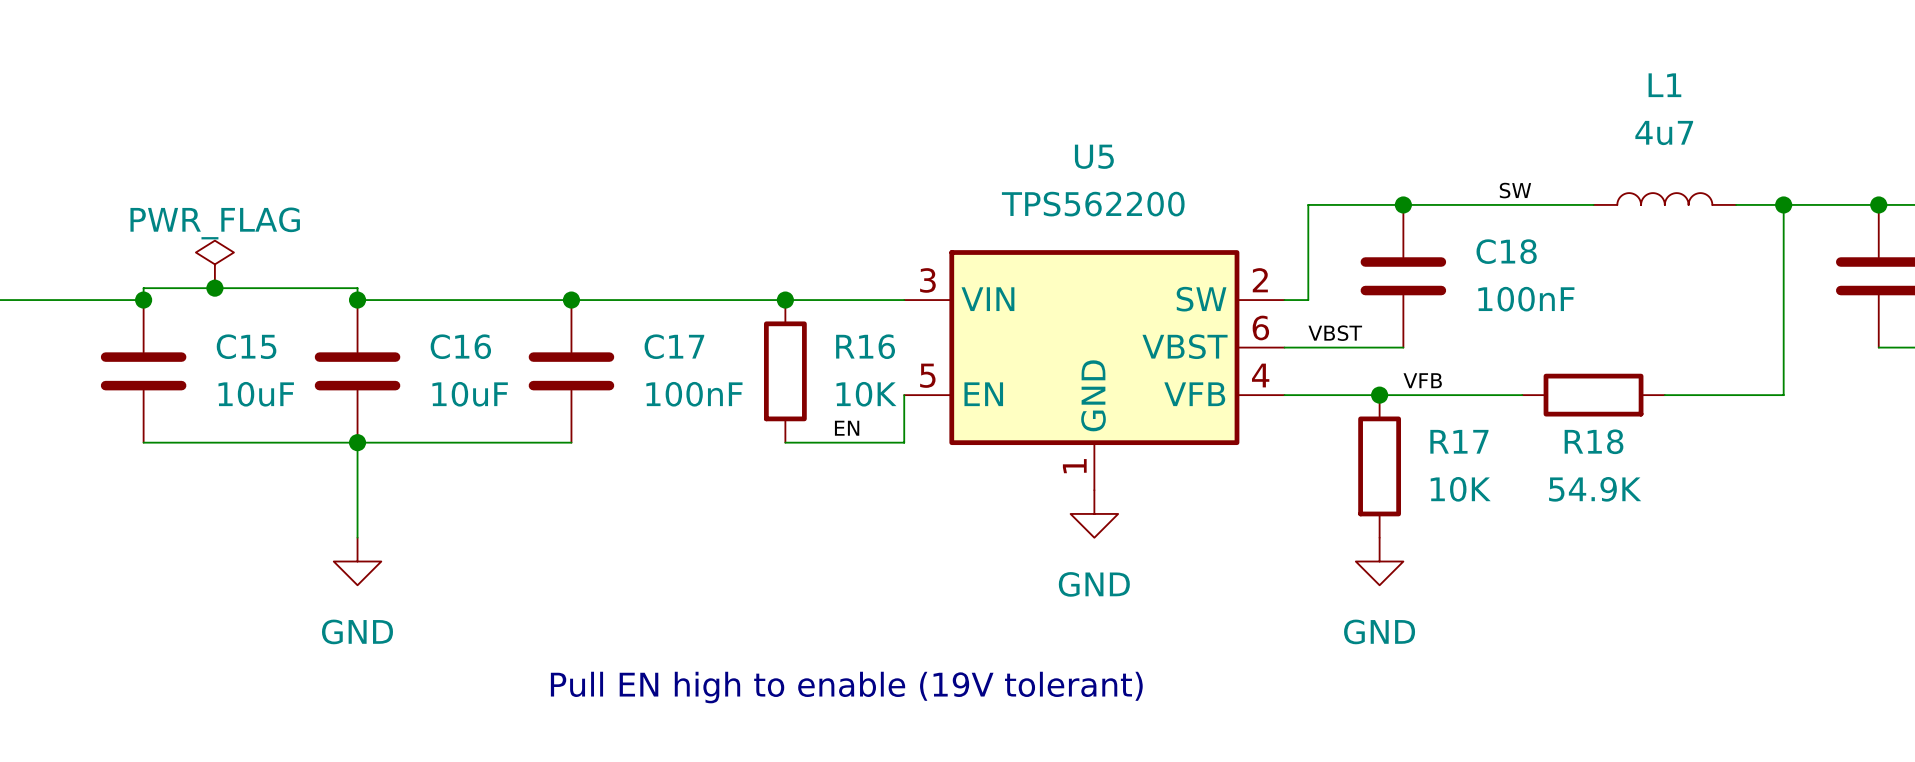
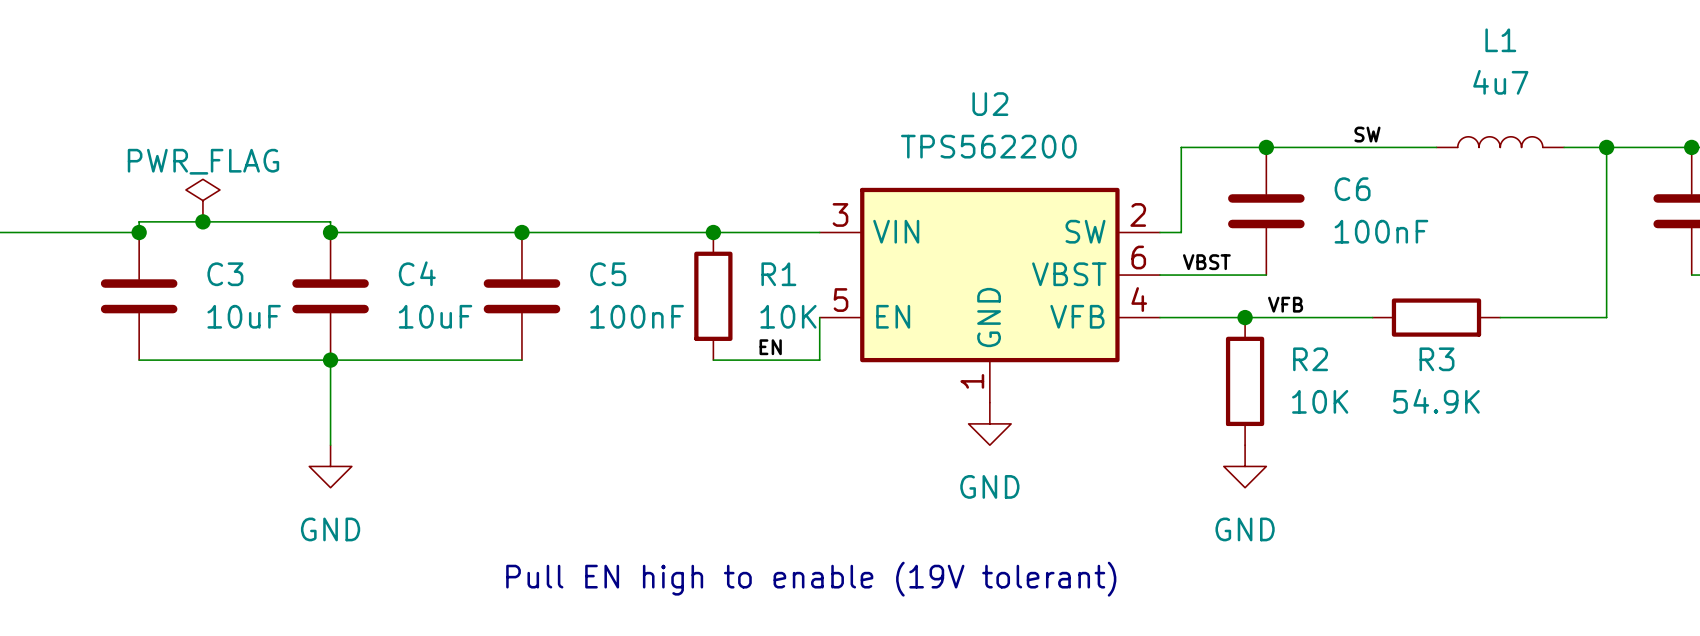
U5 name: U5 (1094, 156) -> U2 (990, 104)
C18 name: C18 (1506, 251) -> C6 (1352, 189)
C15 name: C15 (246, 346) -> C3 (225, 274)
C16 name: C16 (460, 346) -> C4 (417, 273)
C17 name: C17 (674, 346) -> C5 (608, 274)
R16 name: R16 (865, 346) -> R1 (778, 274)
R17 name: R17 (1459, 441) -> R2 (1310, 359)
R18 name: R18 (1594, 441) -> R3 (1436, 359)

